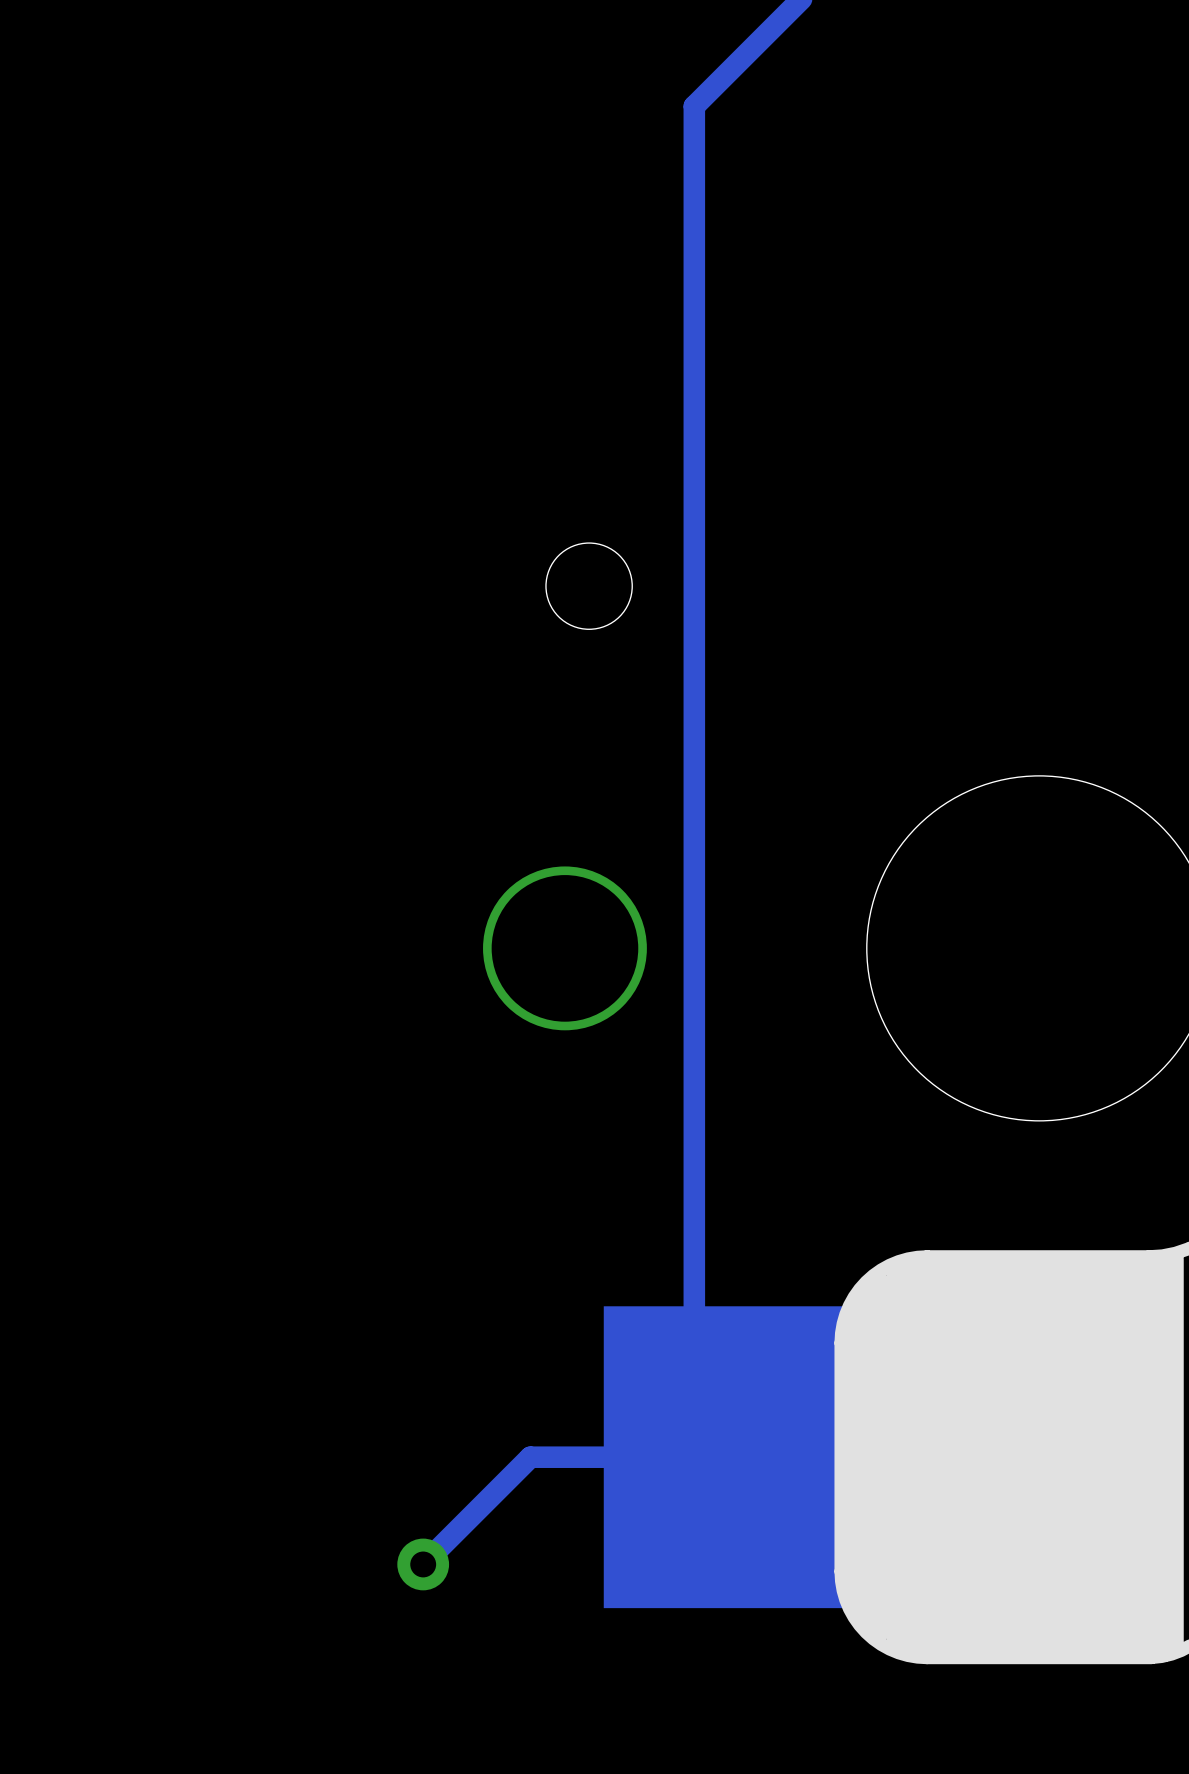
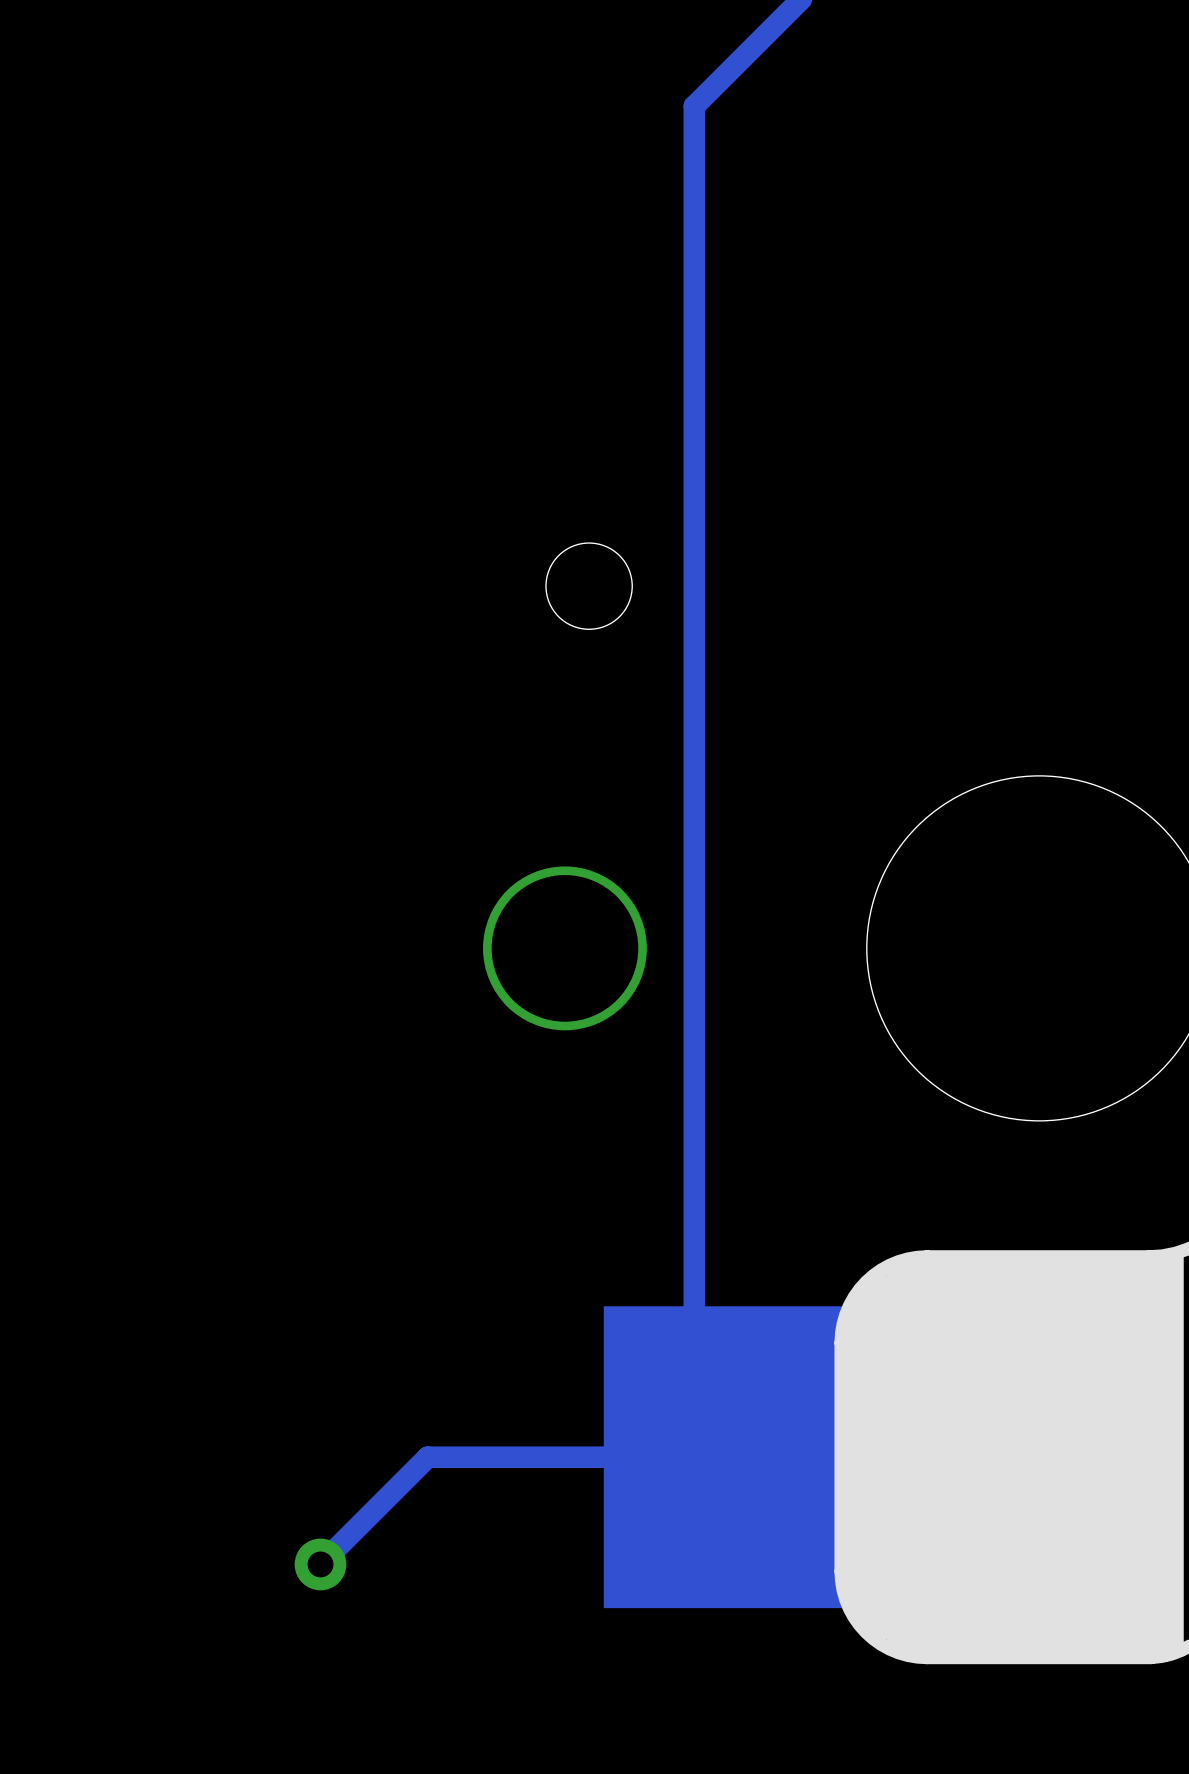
track: (530, 1457) (423, 1564) -> (530, 1457) (427, 1457) (320, 1564)
via position: (423, 1564) -> (320, 1564)

